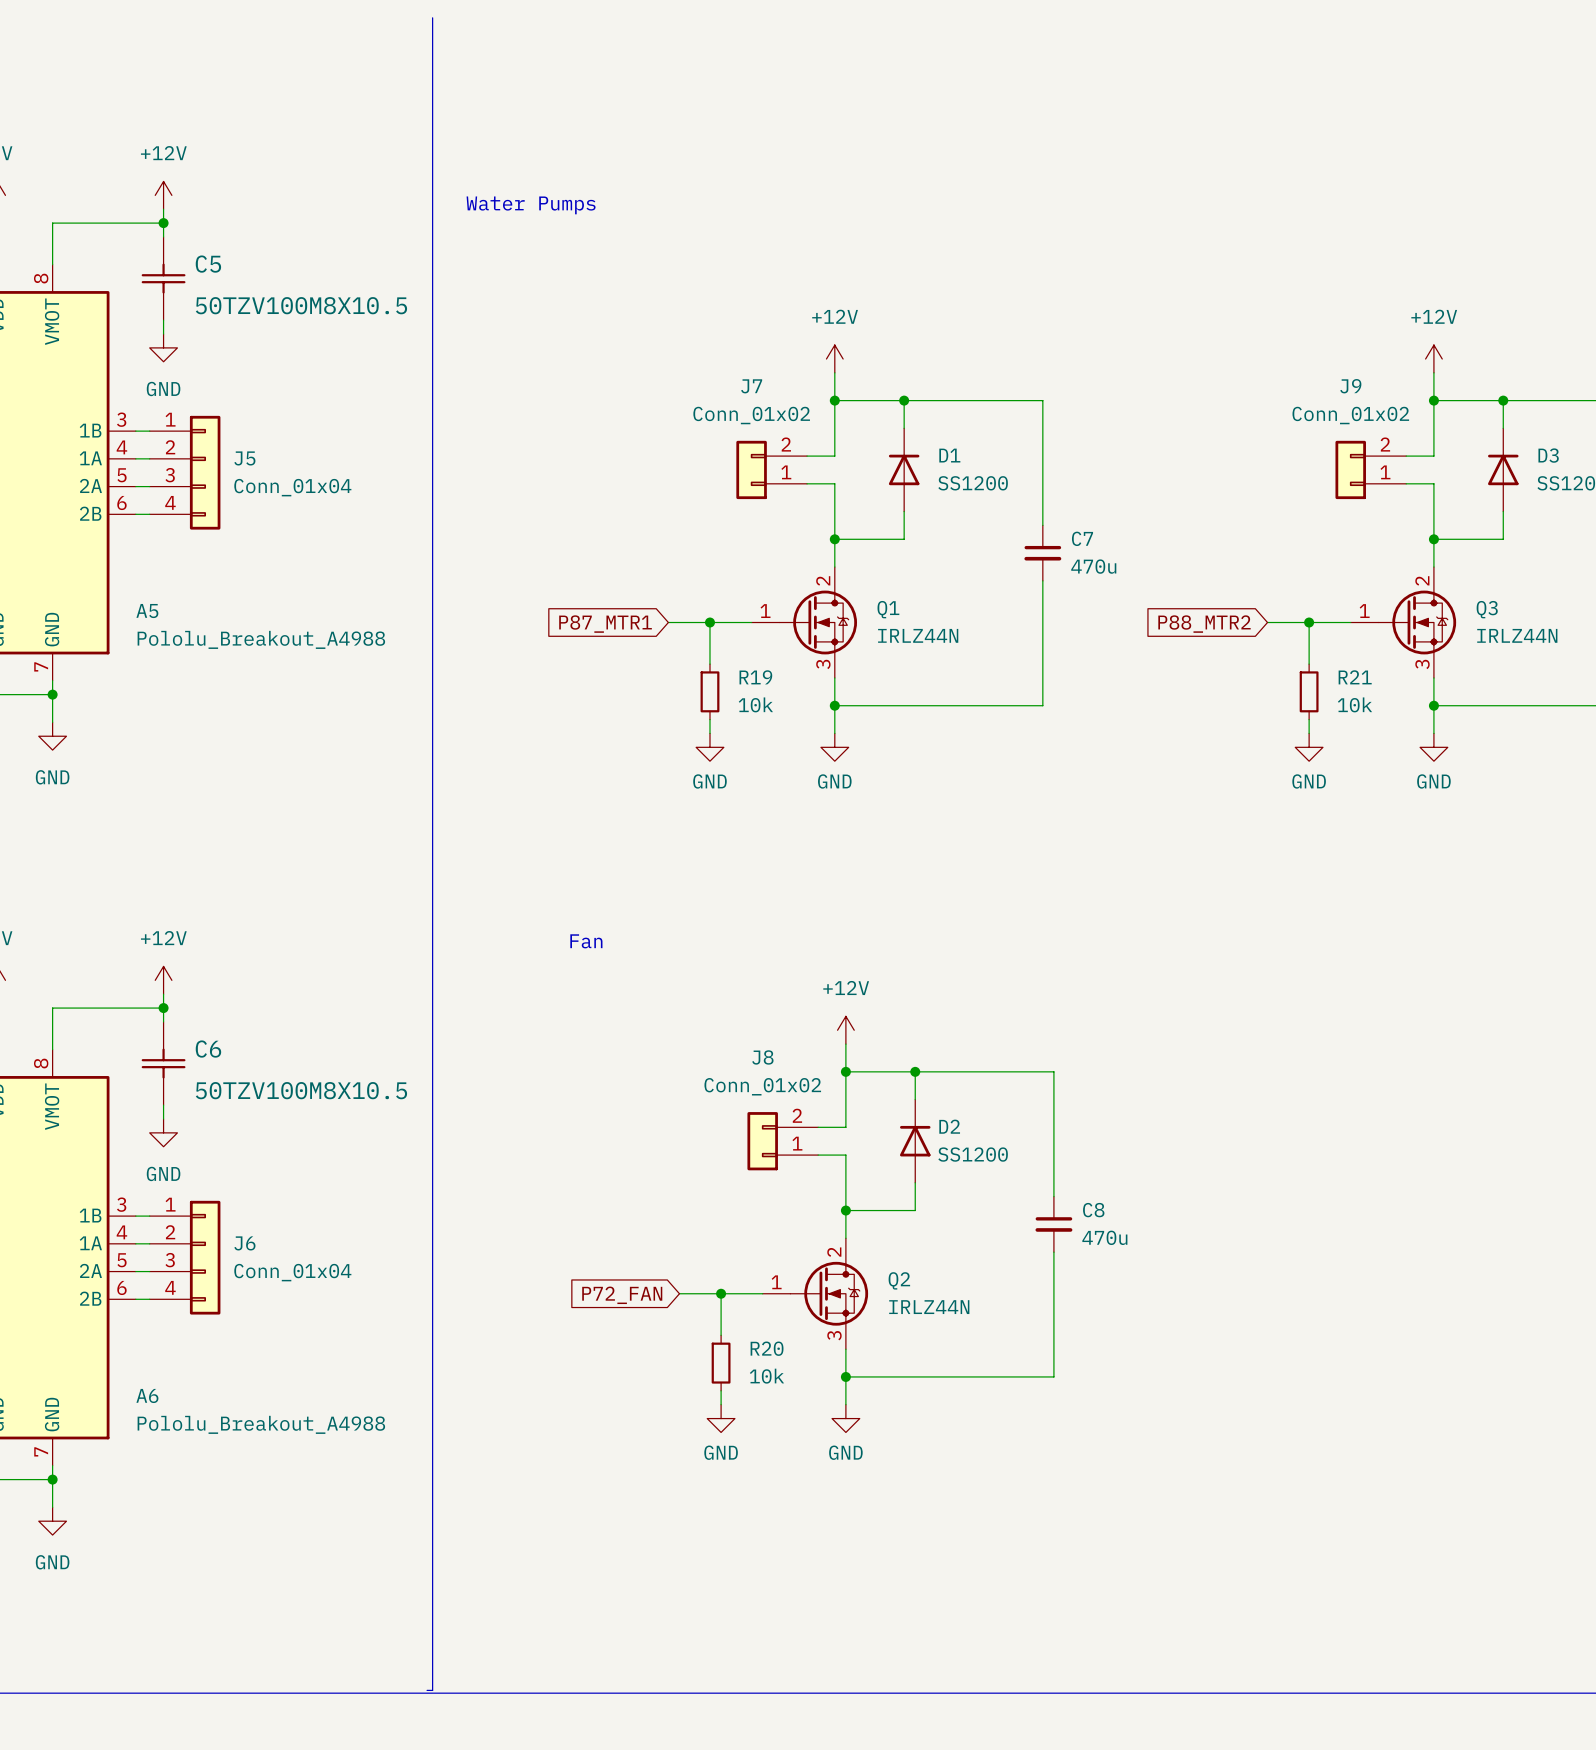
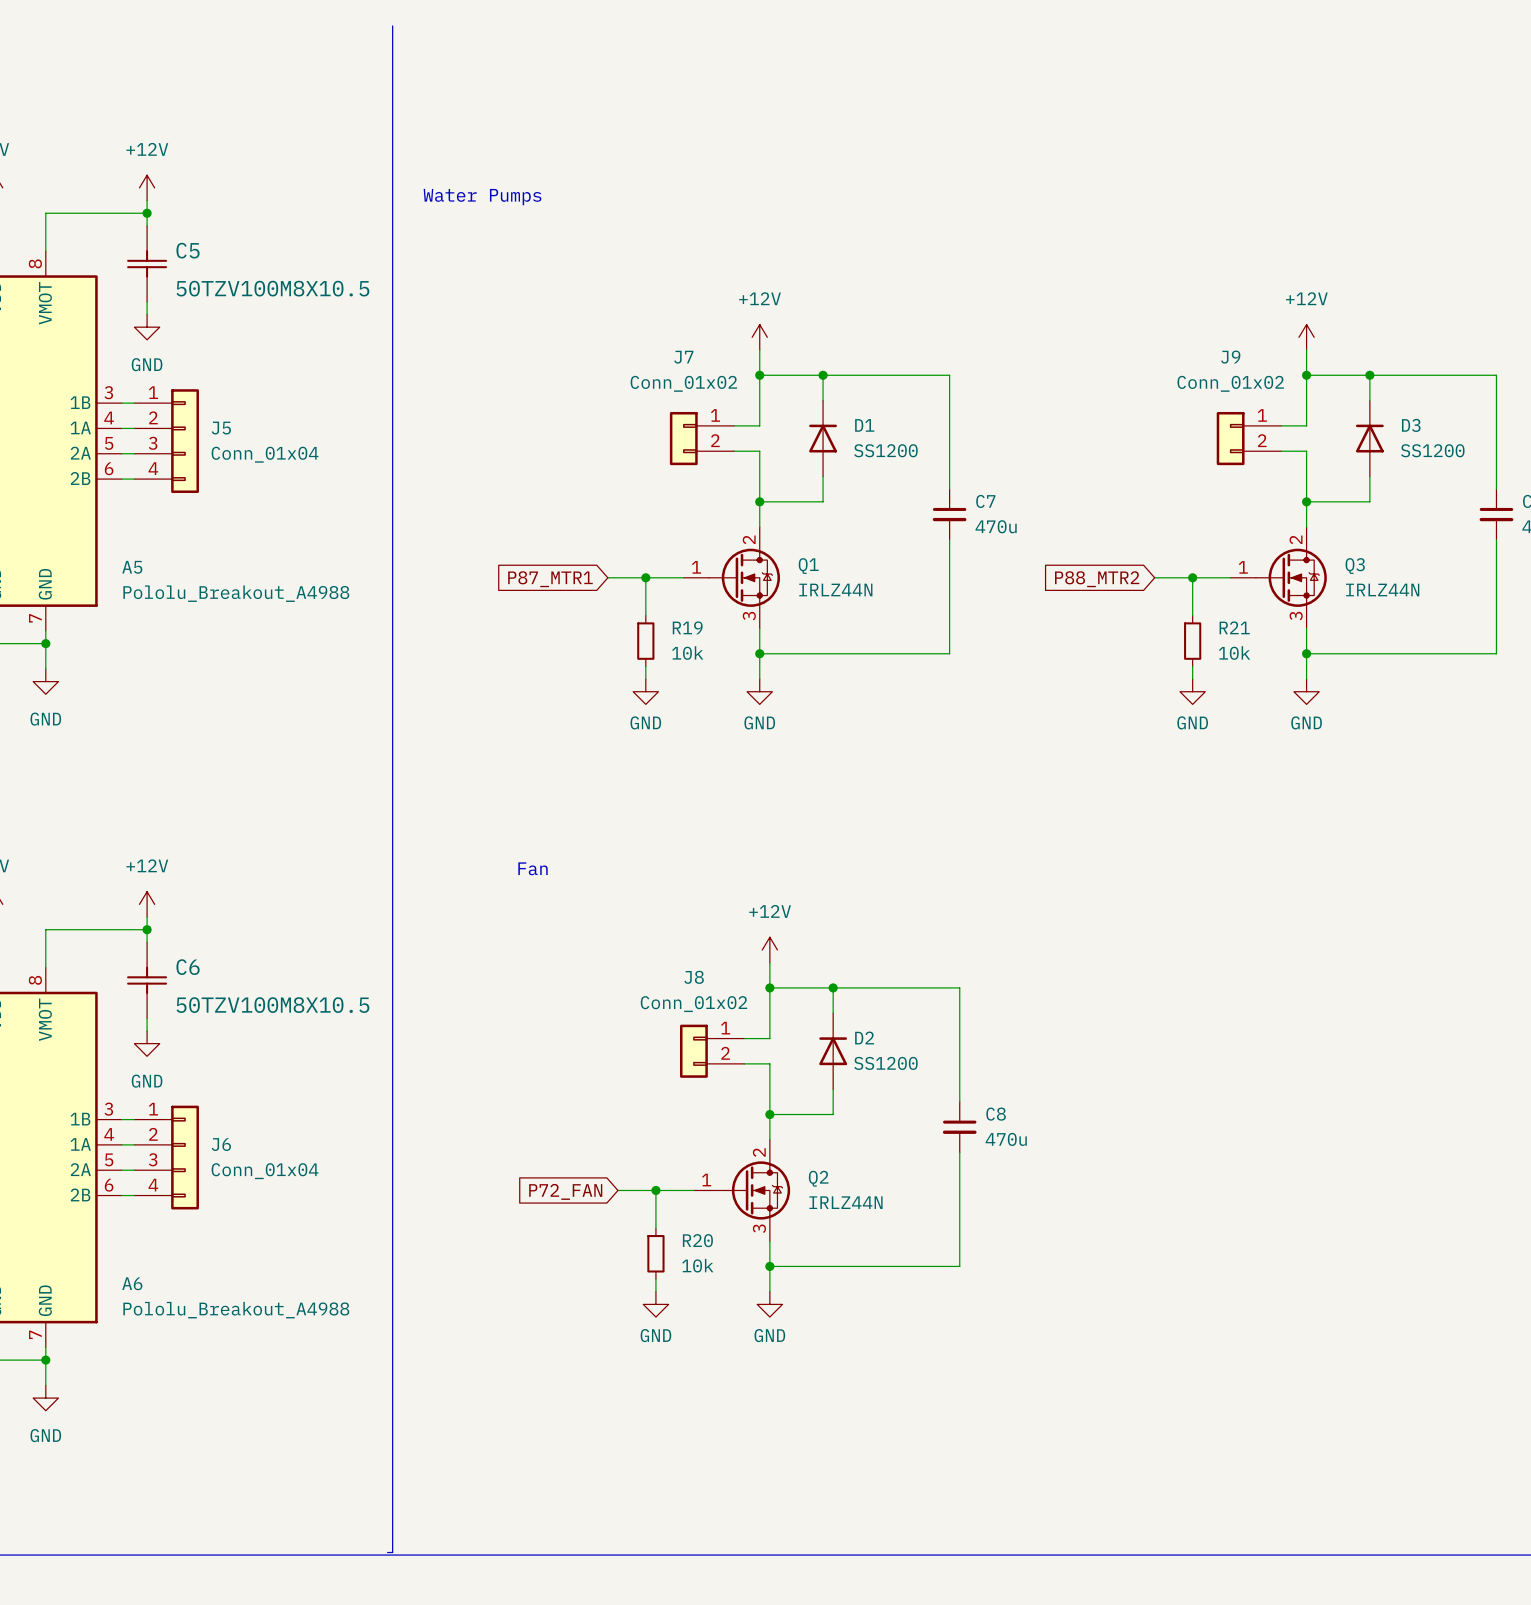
J7 flip: as is (751, 469) -> up-down (683, 438)
J9 flip: as is (1350, 469) -> up-down (1230, 438)
J8 flip: as is (762, 1141) -> up-down (693, 1051)

